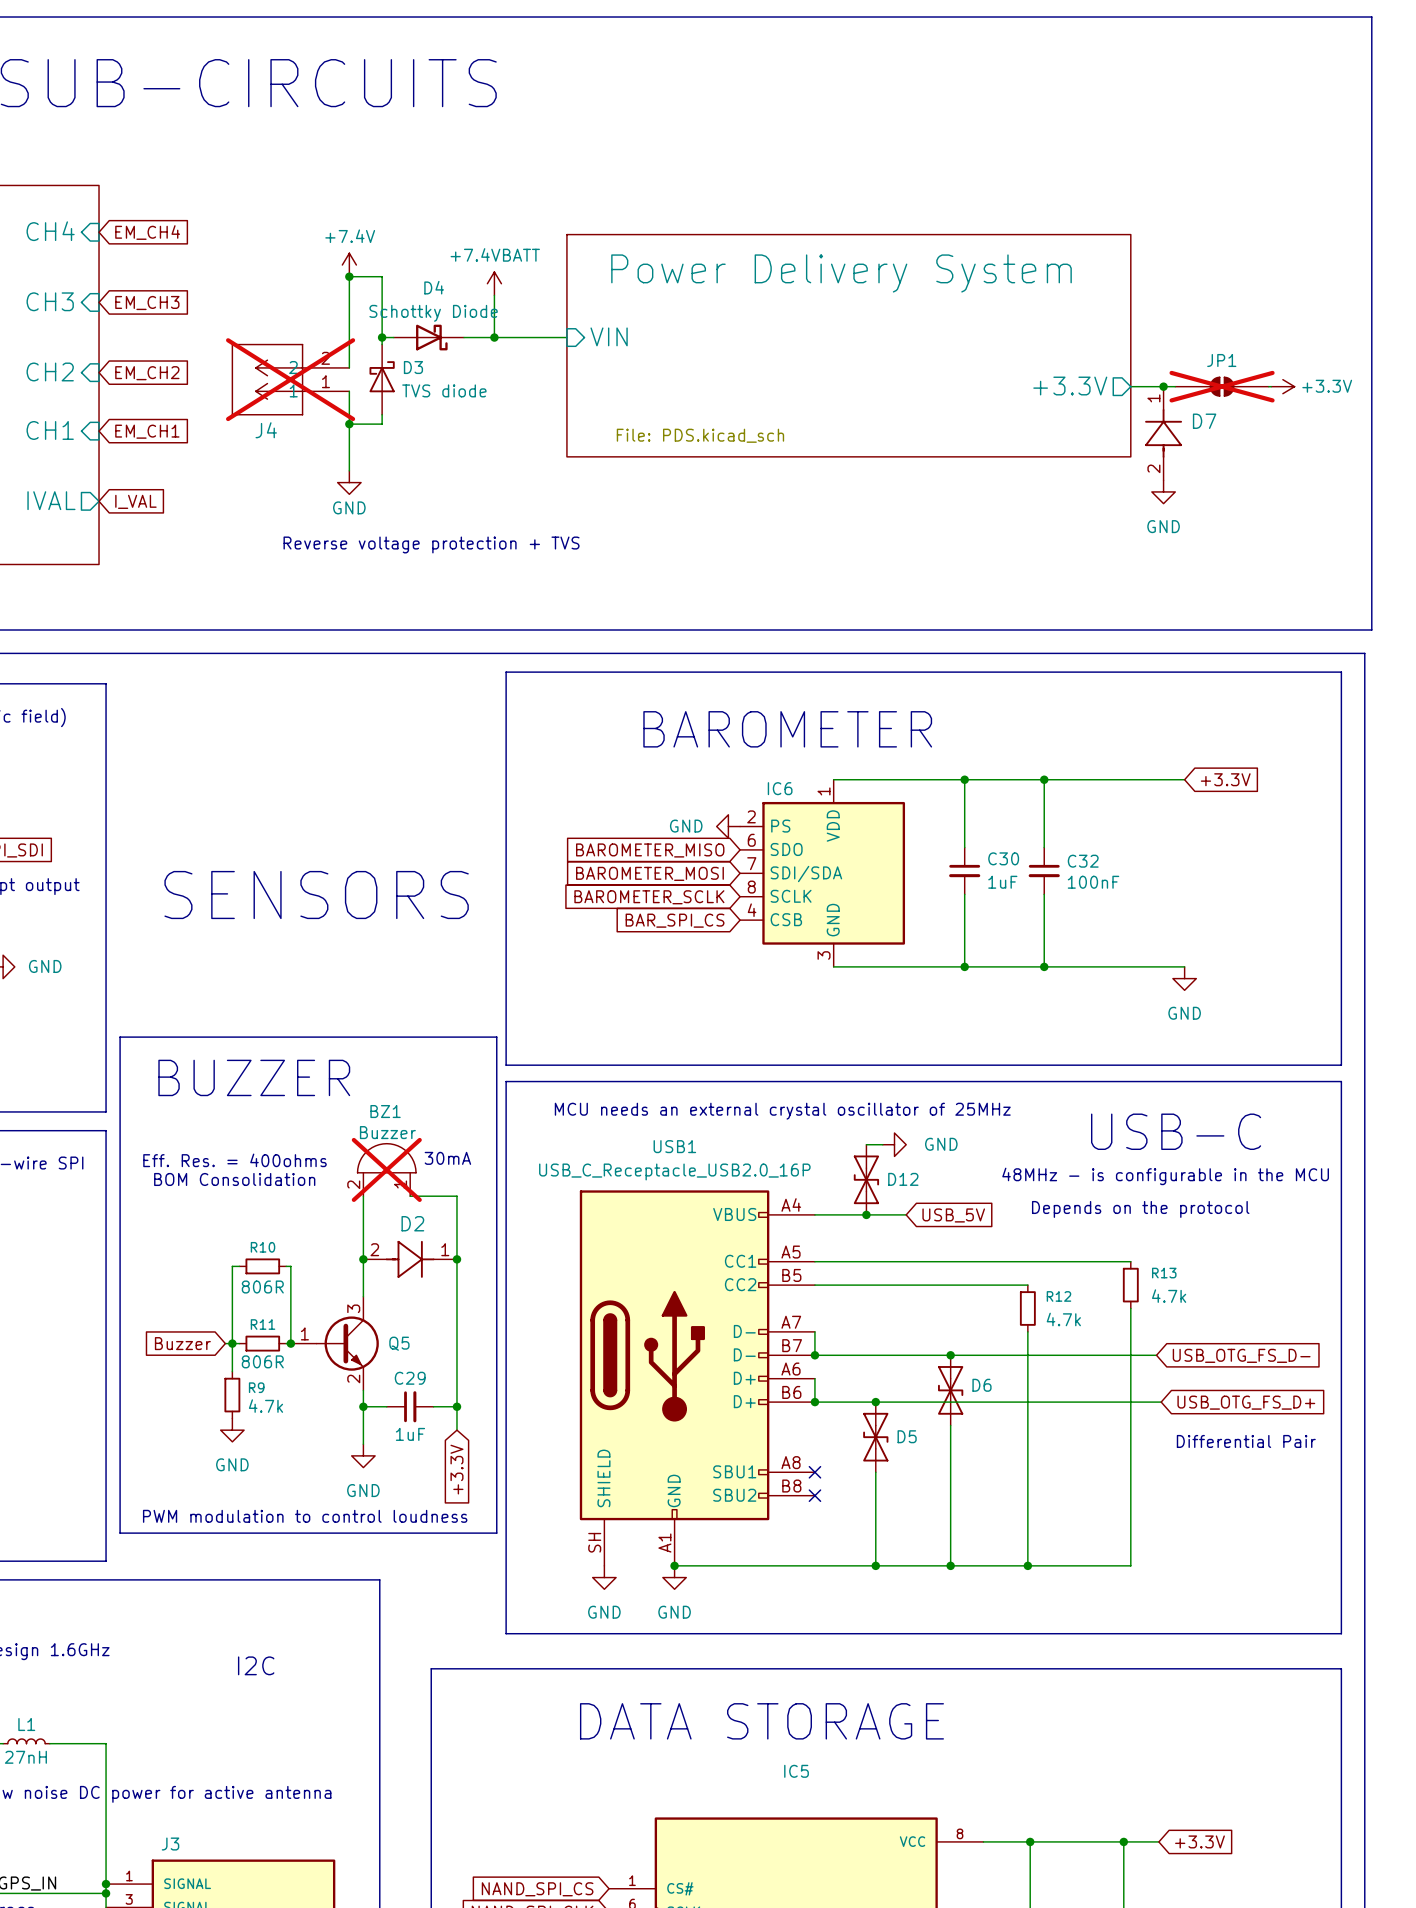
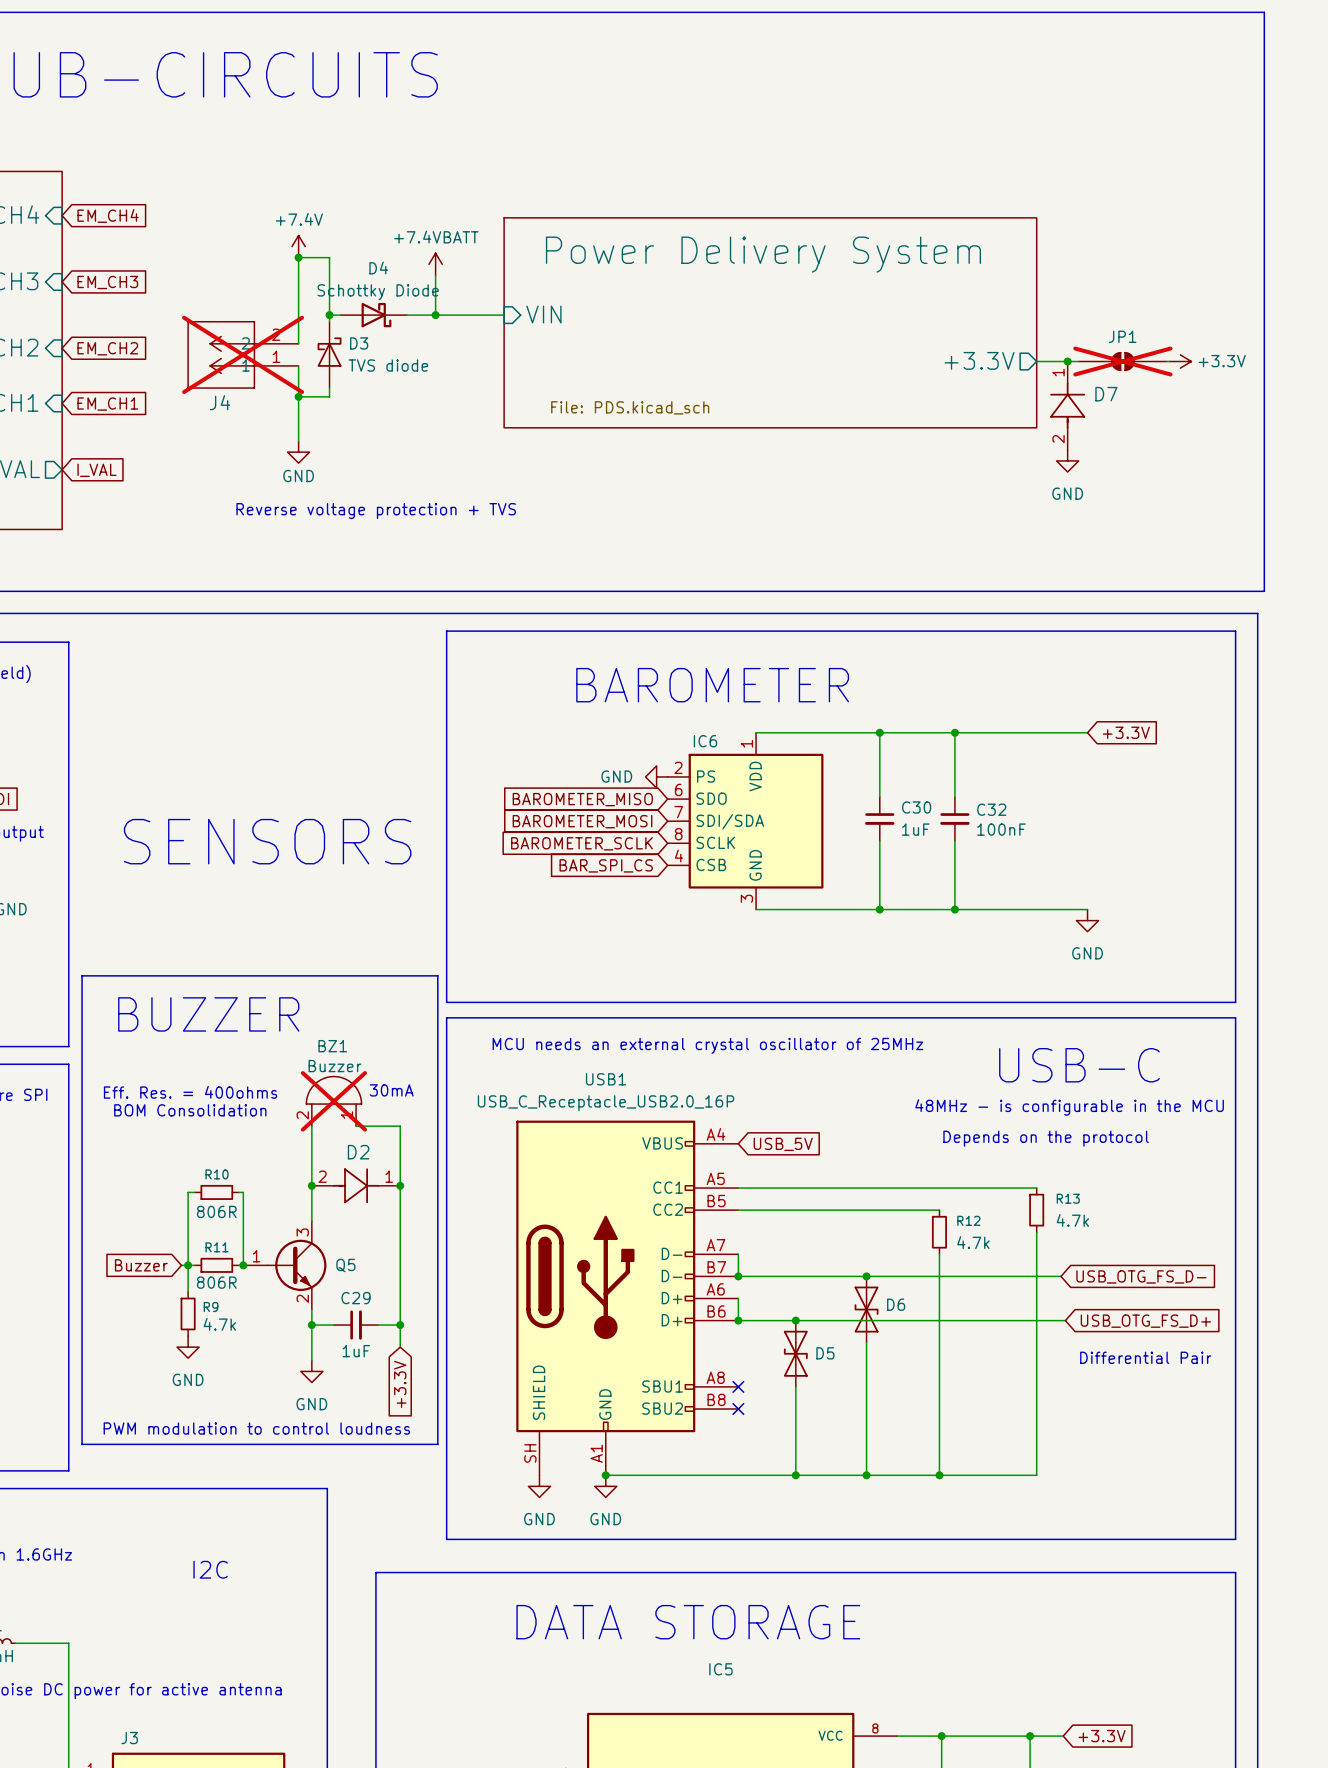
wire: (866, 1144) (882, 1144) -> none
power symbol: GND (894, 1144) -> none
D12: (866, 1179) -> none
wire: (814, 1214) (906, 1214) -> none
junction: (866, 1214) -> none
global label position: USB_5V (953, 1215) -> USB_5V (783, 1144)

